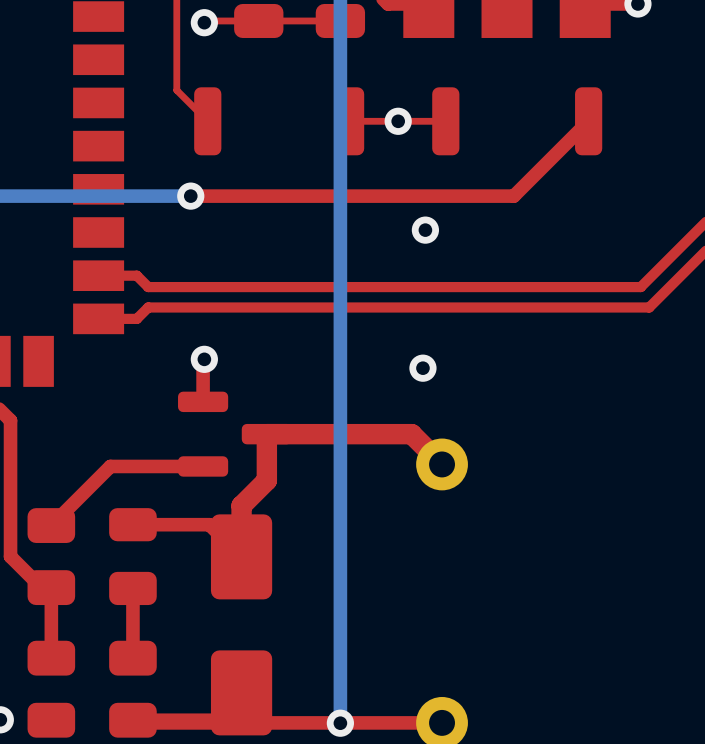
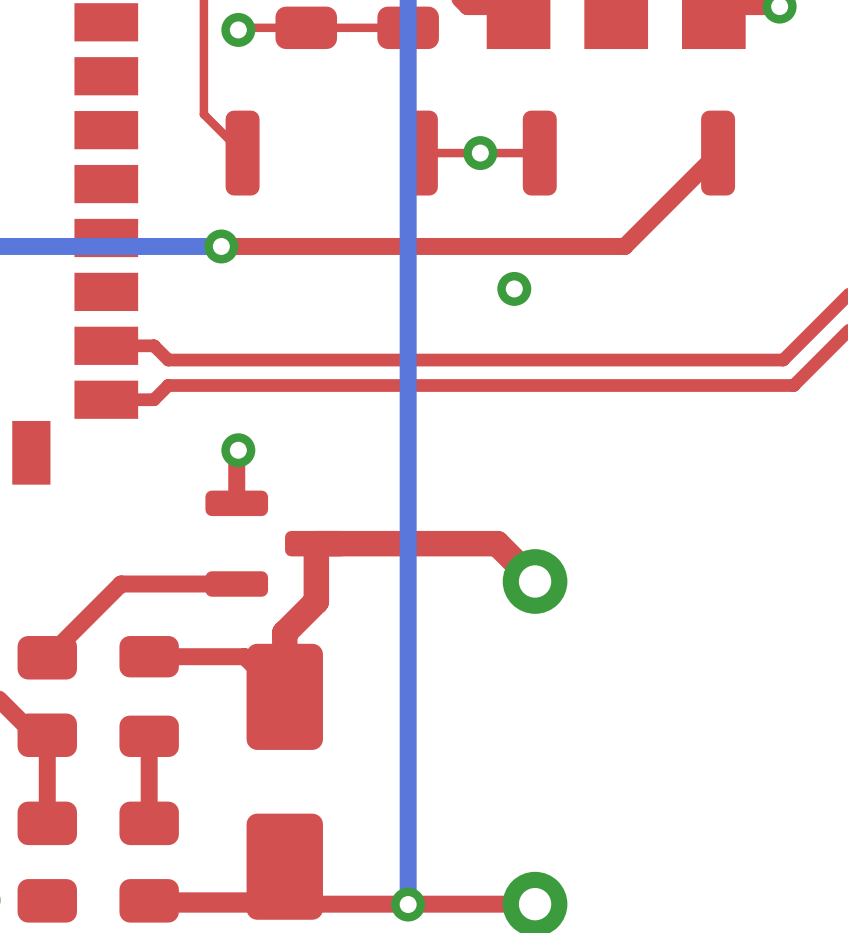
via: (422, 368) -> none

